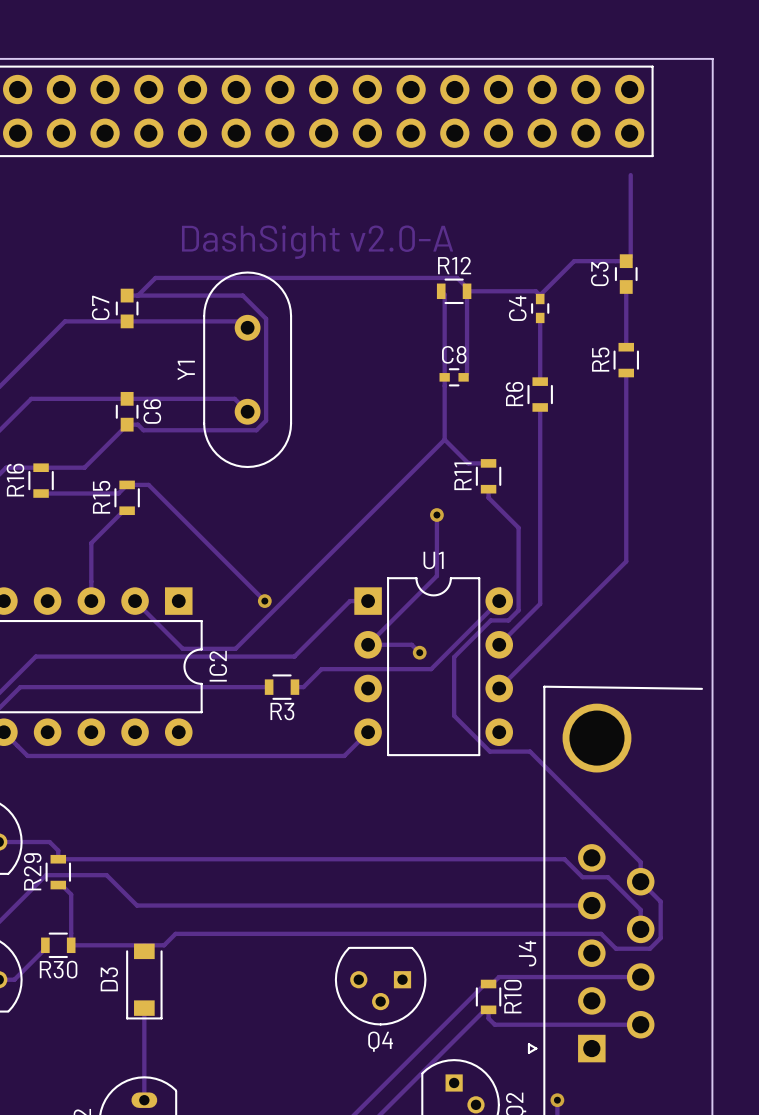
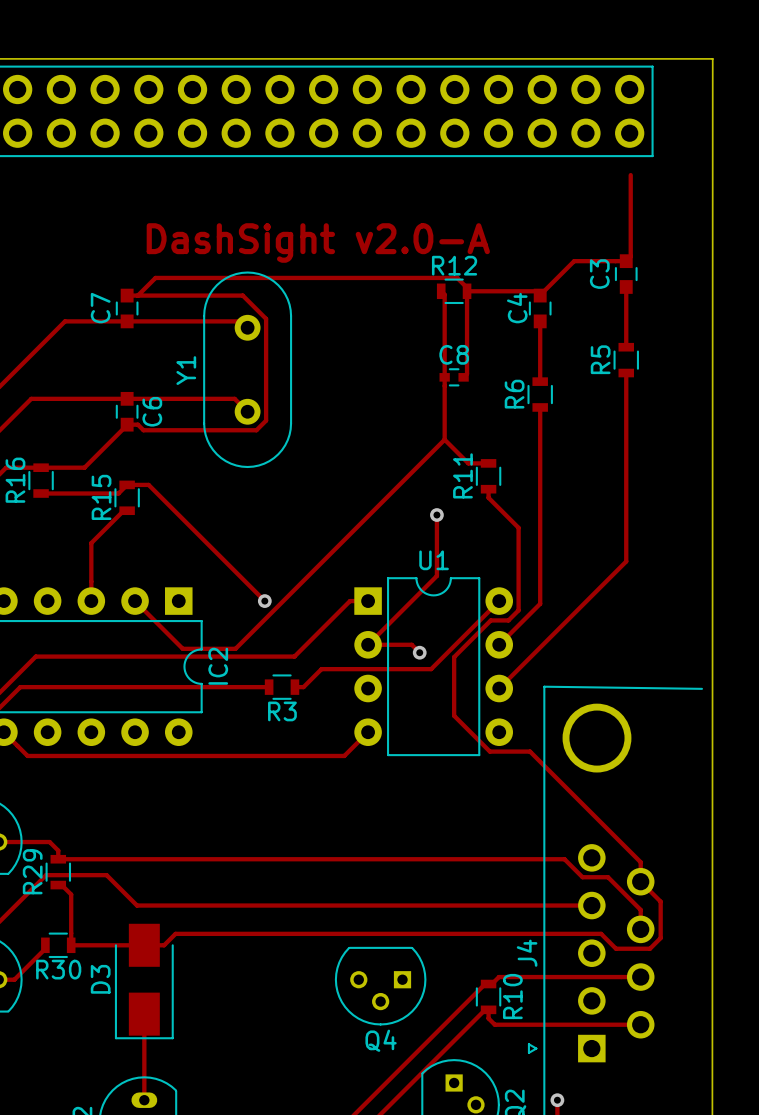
C4 footprint: [531, 293, 550, 324] -> [528, 288, 552, 329]
D3 footprint: [126, 943, 163, 1020] -> [114, 923, 174, 1040]

